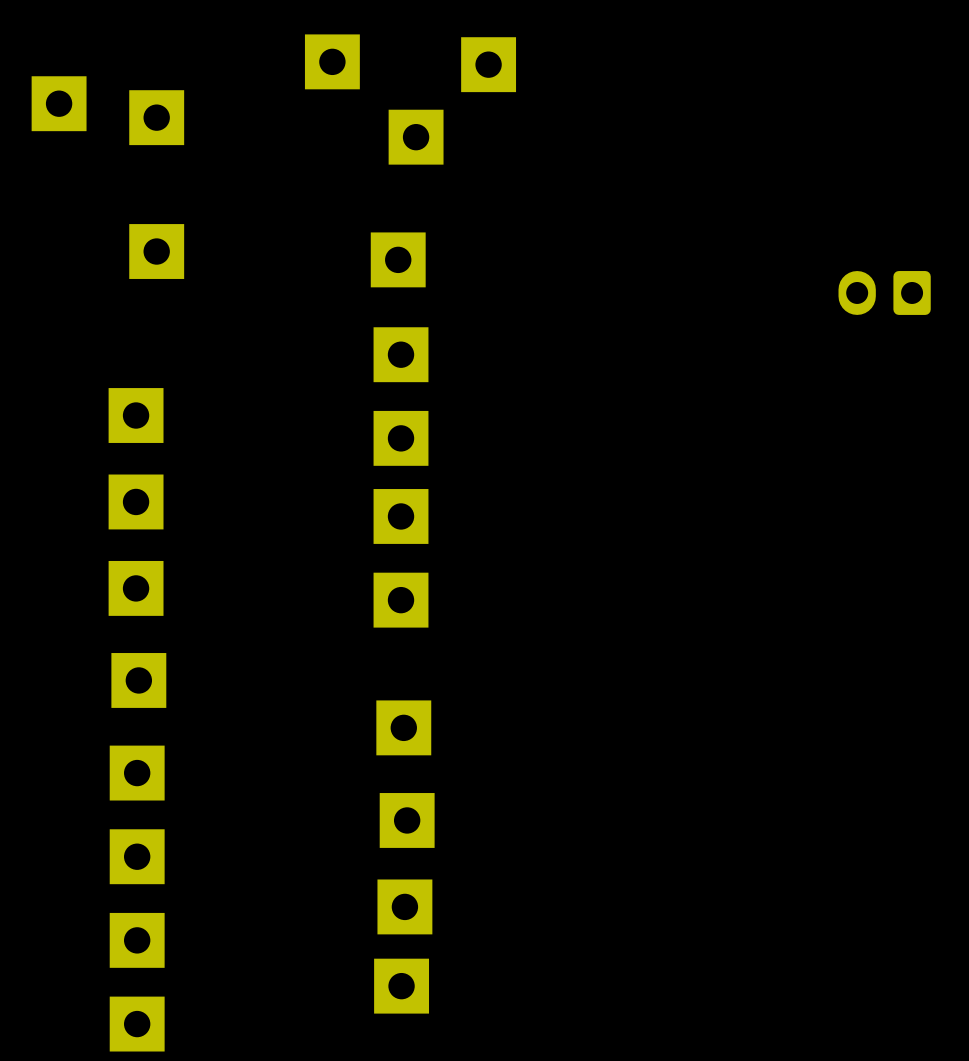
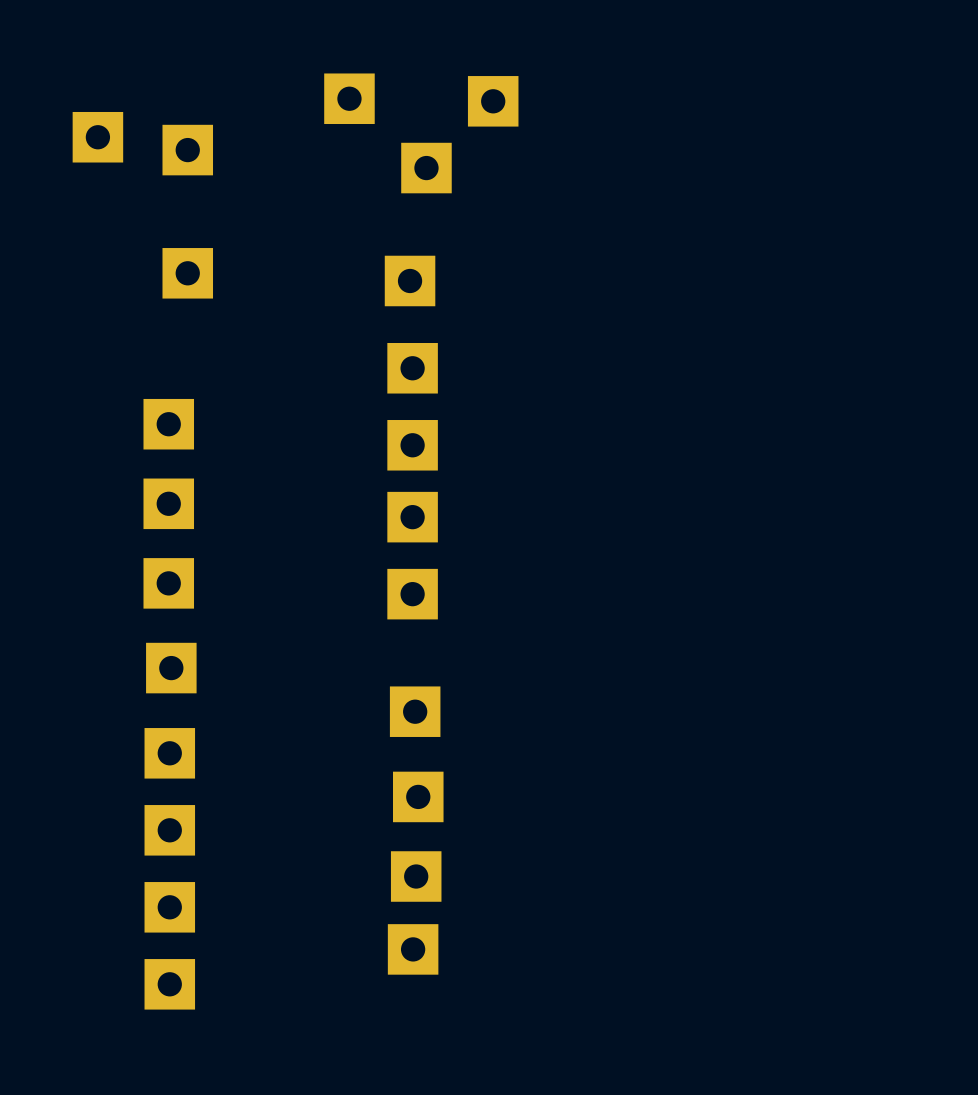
part: (884, 292) -> none

